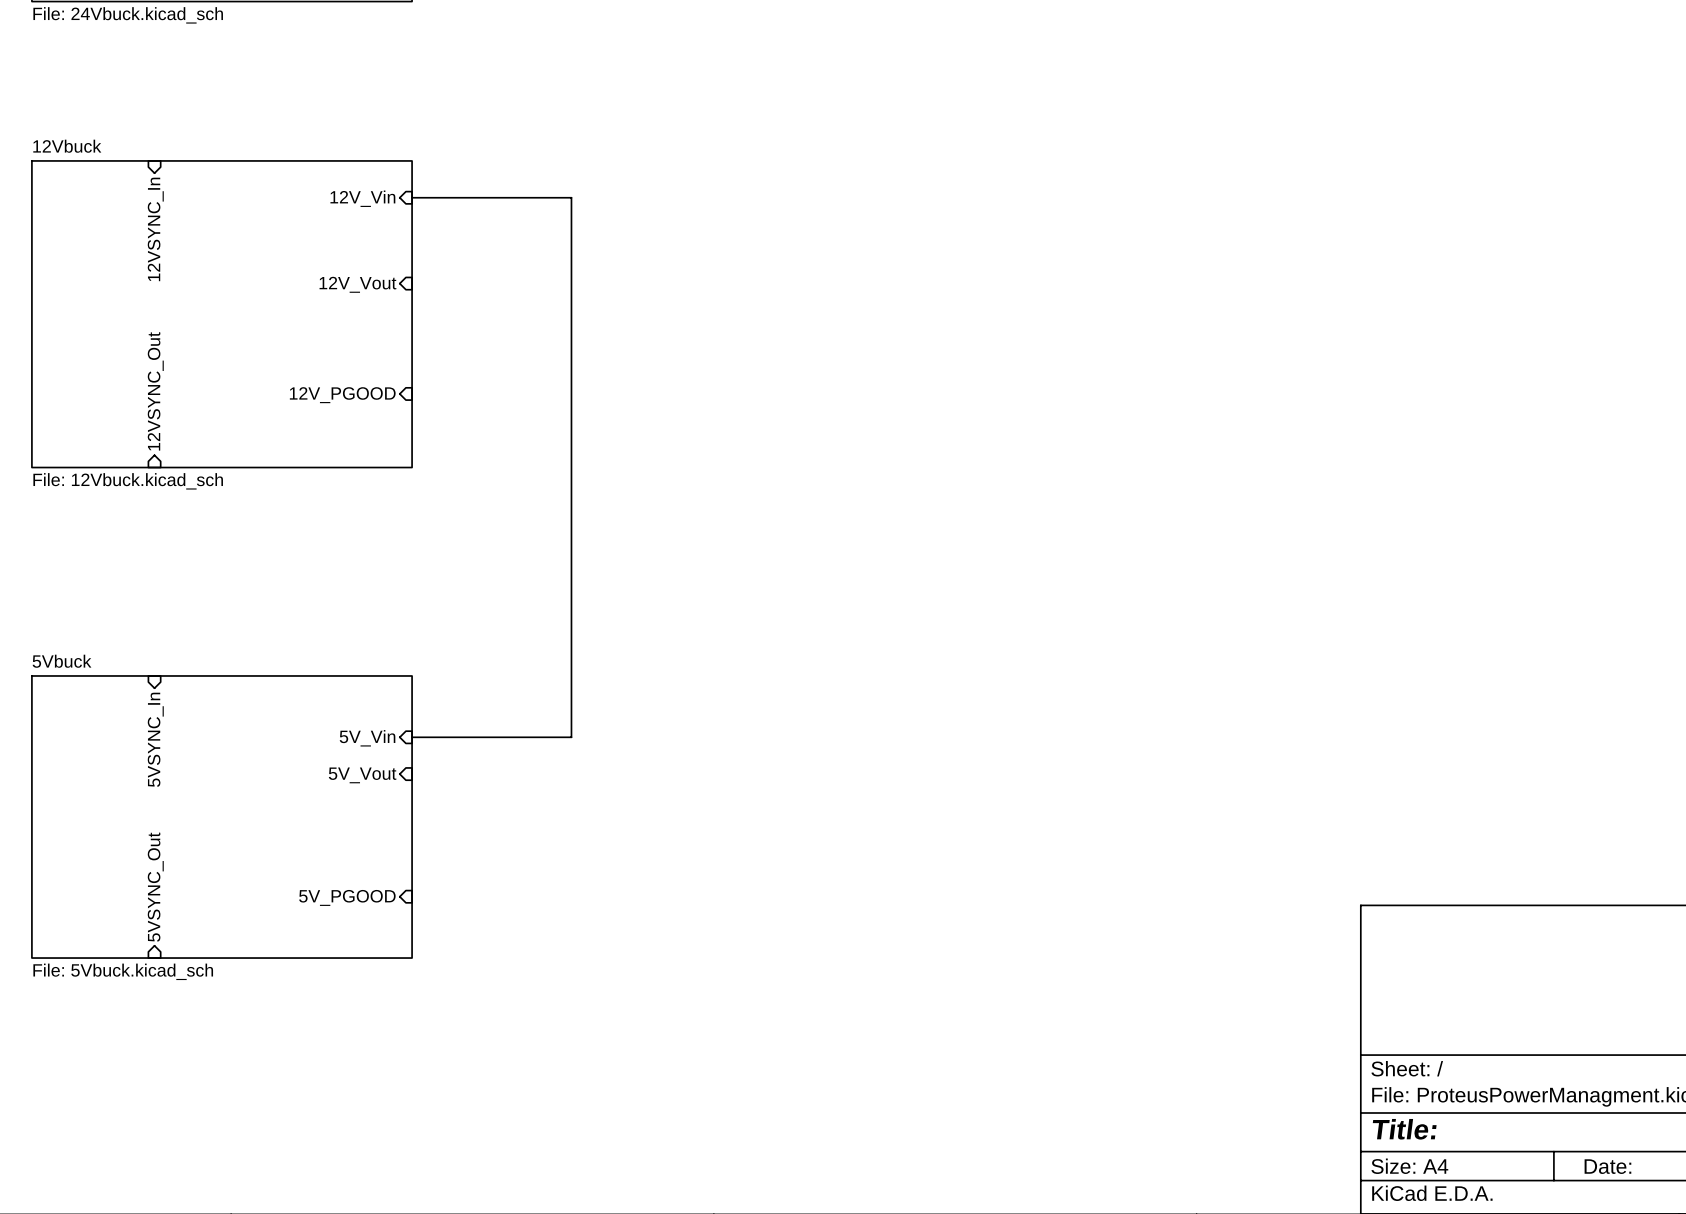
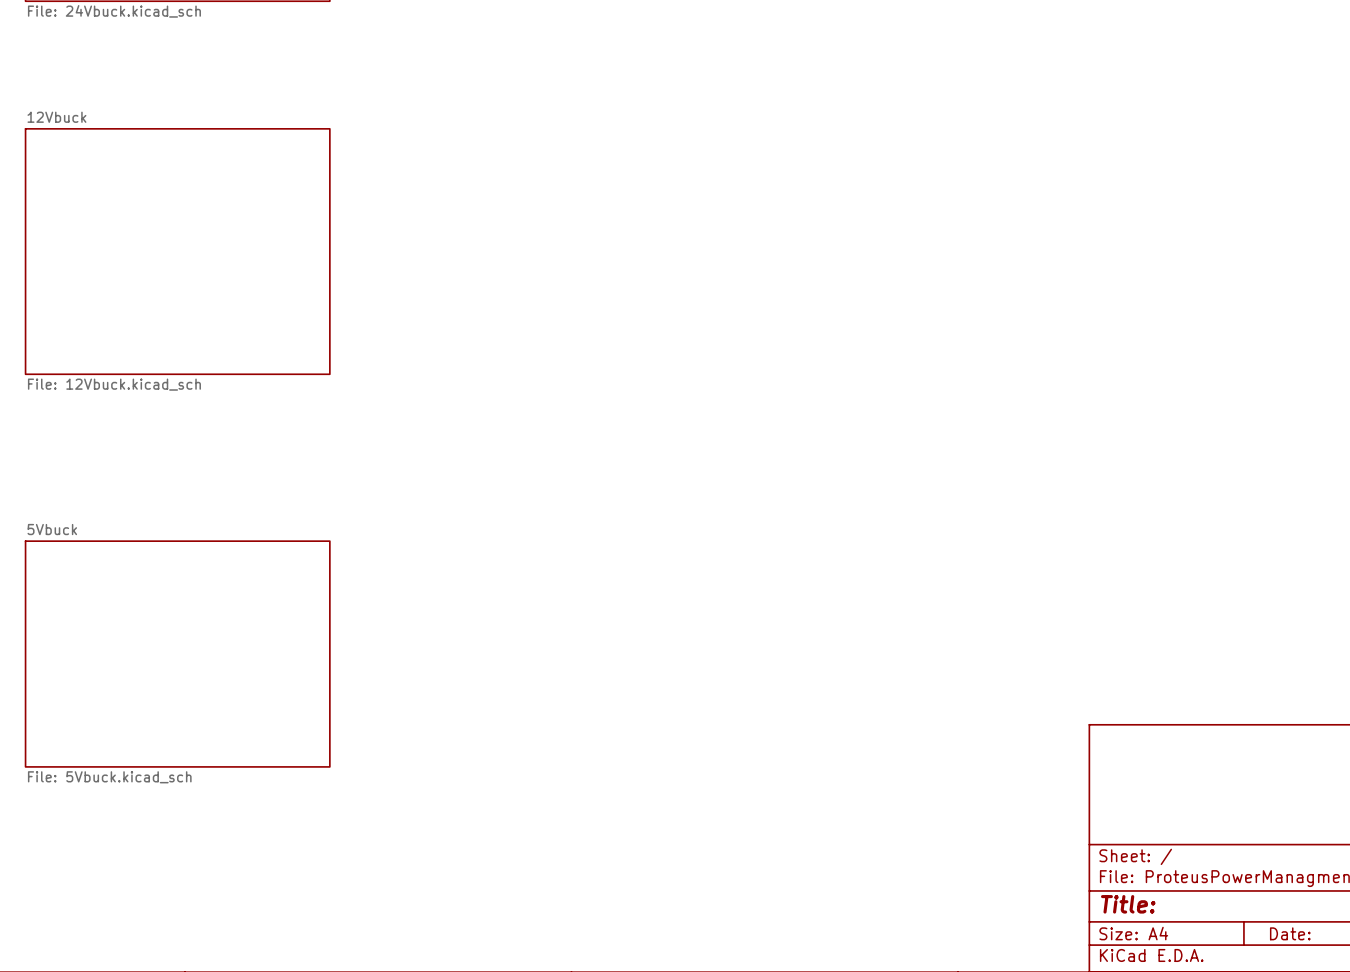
wire: (412, 197) (571, 197) (571, 737) (412, 737) -> none
sheet pin: 12V_Vin (362, 198) -> none
sheet pin: 12VSYNC_In (155, 229) -> none
sheet pin: 12V_Vout (357, 284) -> none
sheet pin: 12VSYNC_Out (155, 391) -> none
sheet pin: 12V_PGOOD (342, 395) -> none
sheet pin: 5V_Vin (367, 738) -> none
sheet pin: 5VSYNC_In (155, 739) -> none
sheet pin: 5V_Vout (362, 775) -> none
sheet pin: 5VSYNC_Out (155, 887) -> none
sheet pin: 5V_PGOOD (347, 897) -> none

